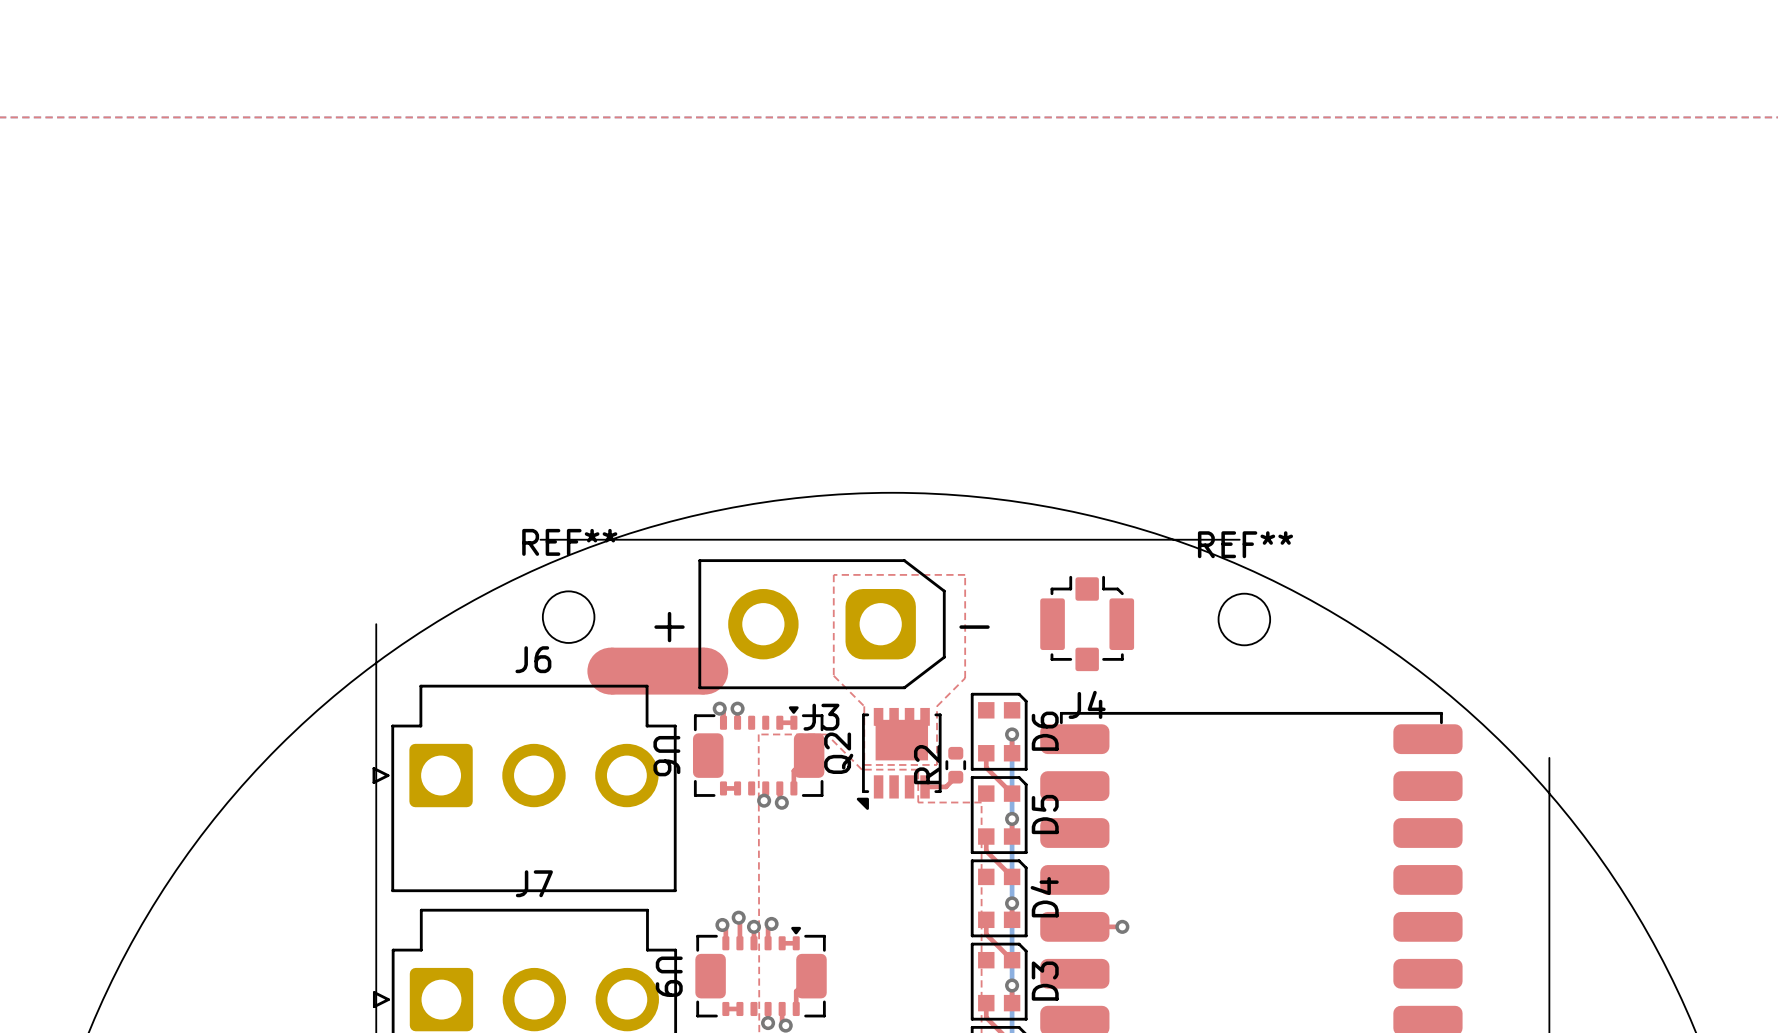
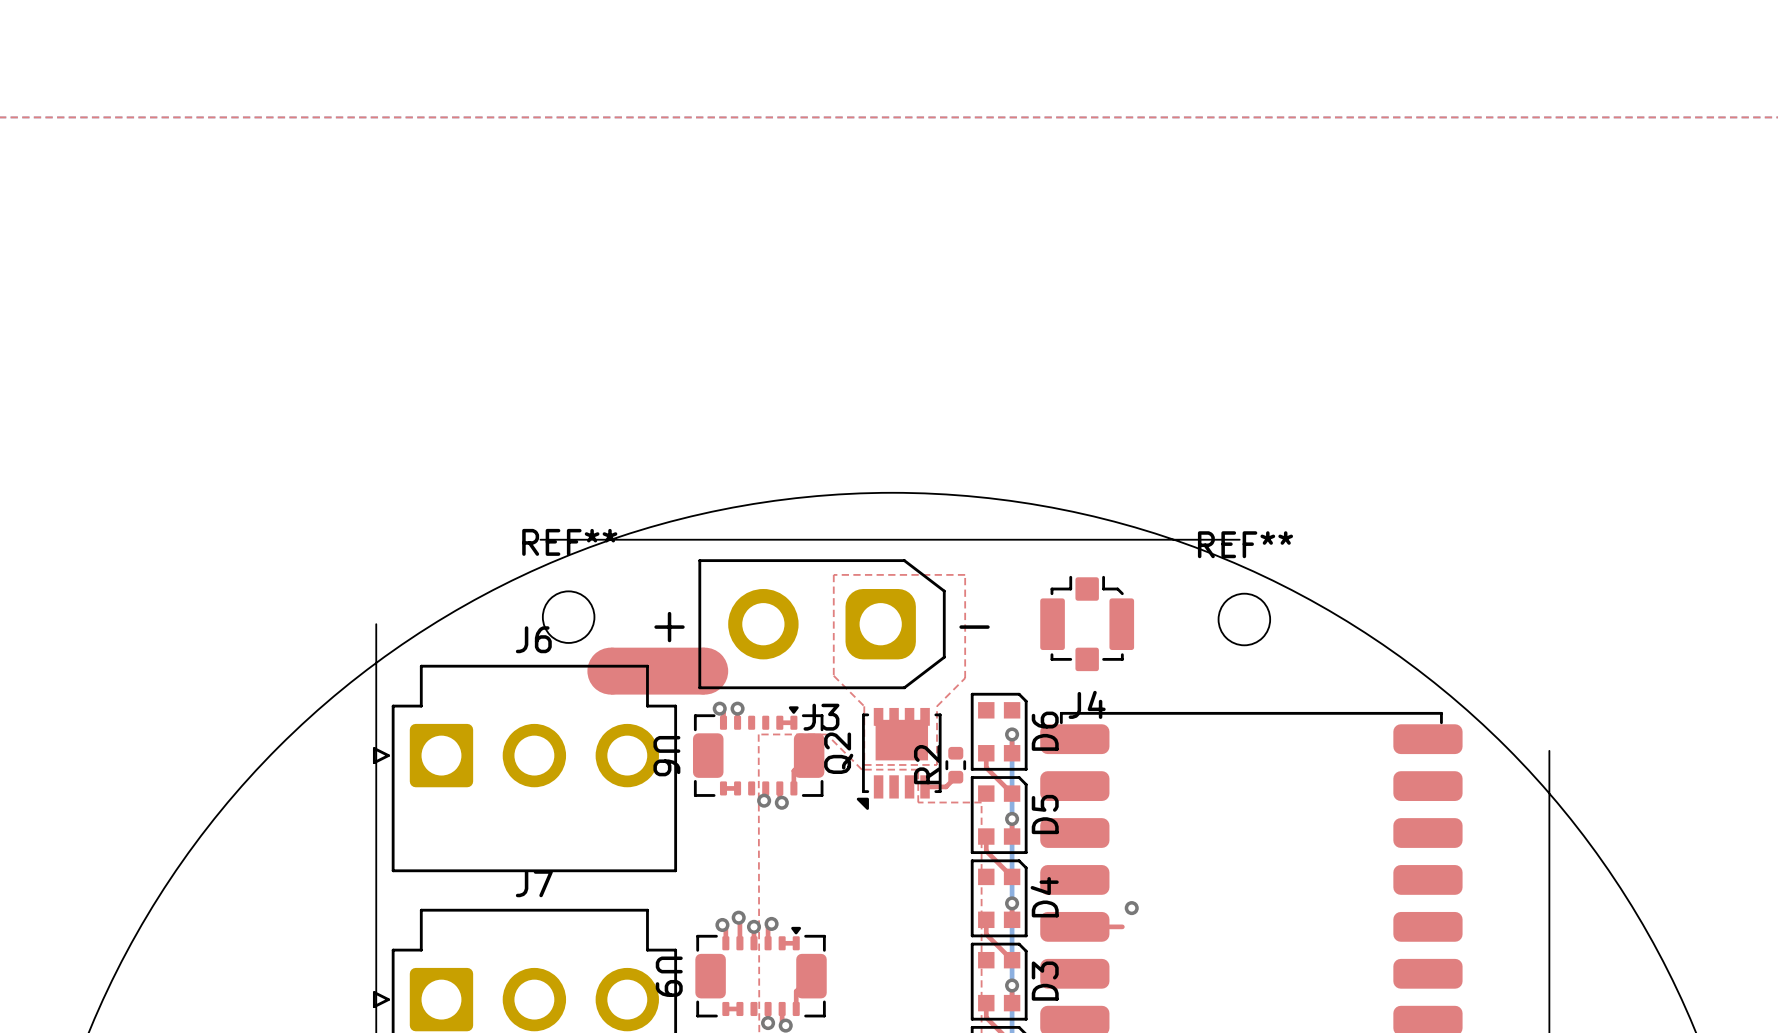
board edge: none -> (1549, 750) (1549, 757)
J6 position: (524, 788) -> (525, 768)
via position: (1122, 926) -> (1131, 908)

